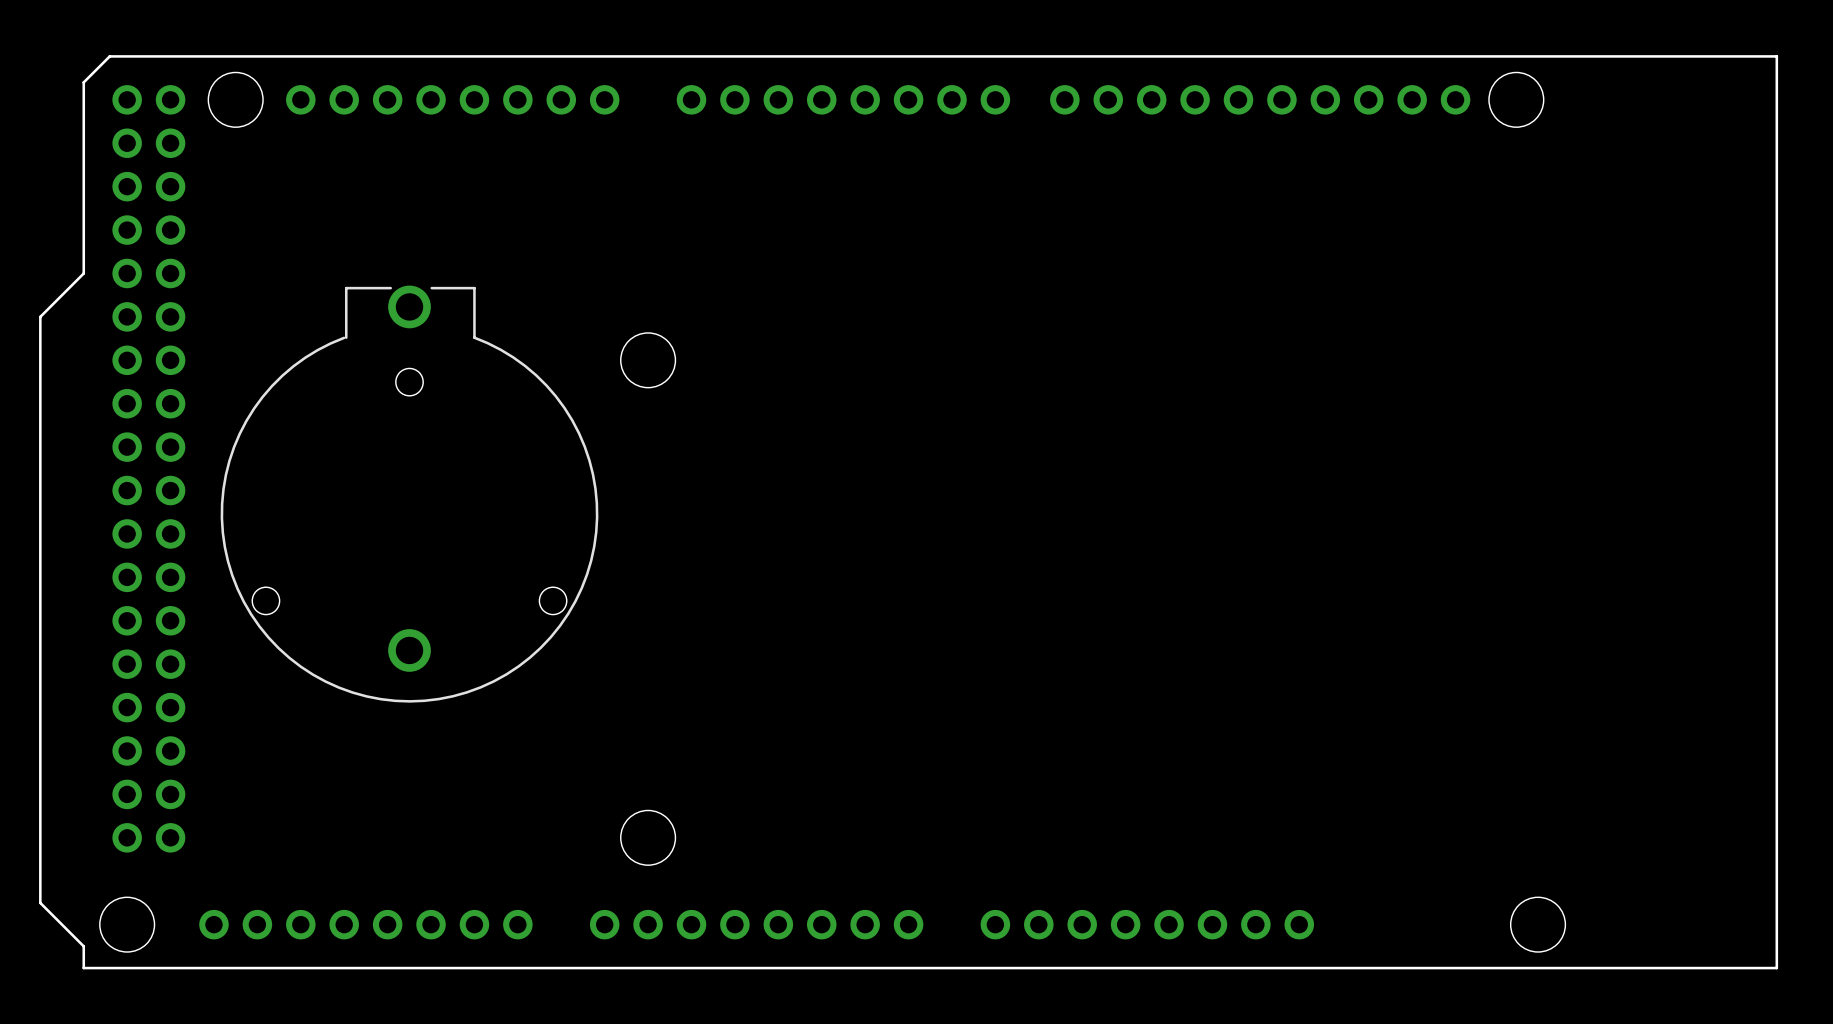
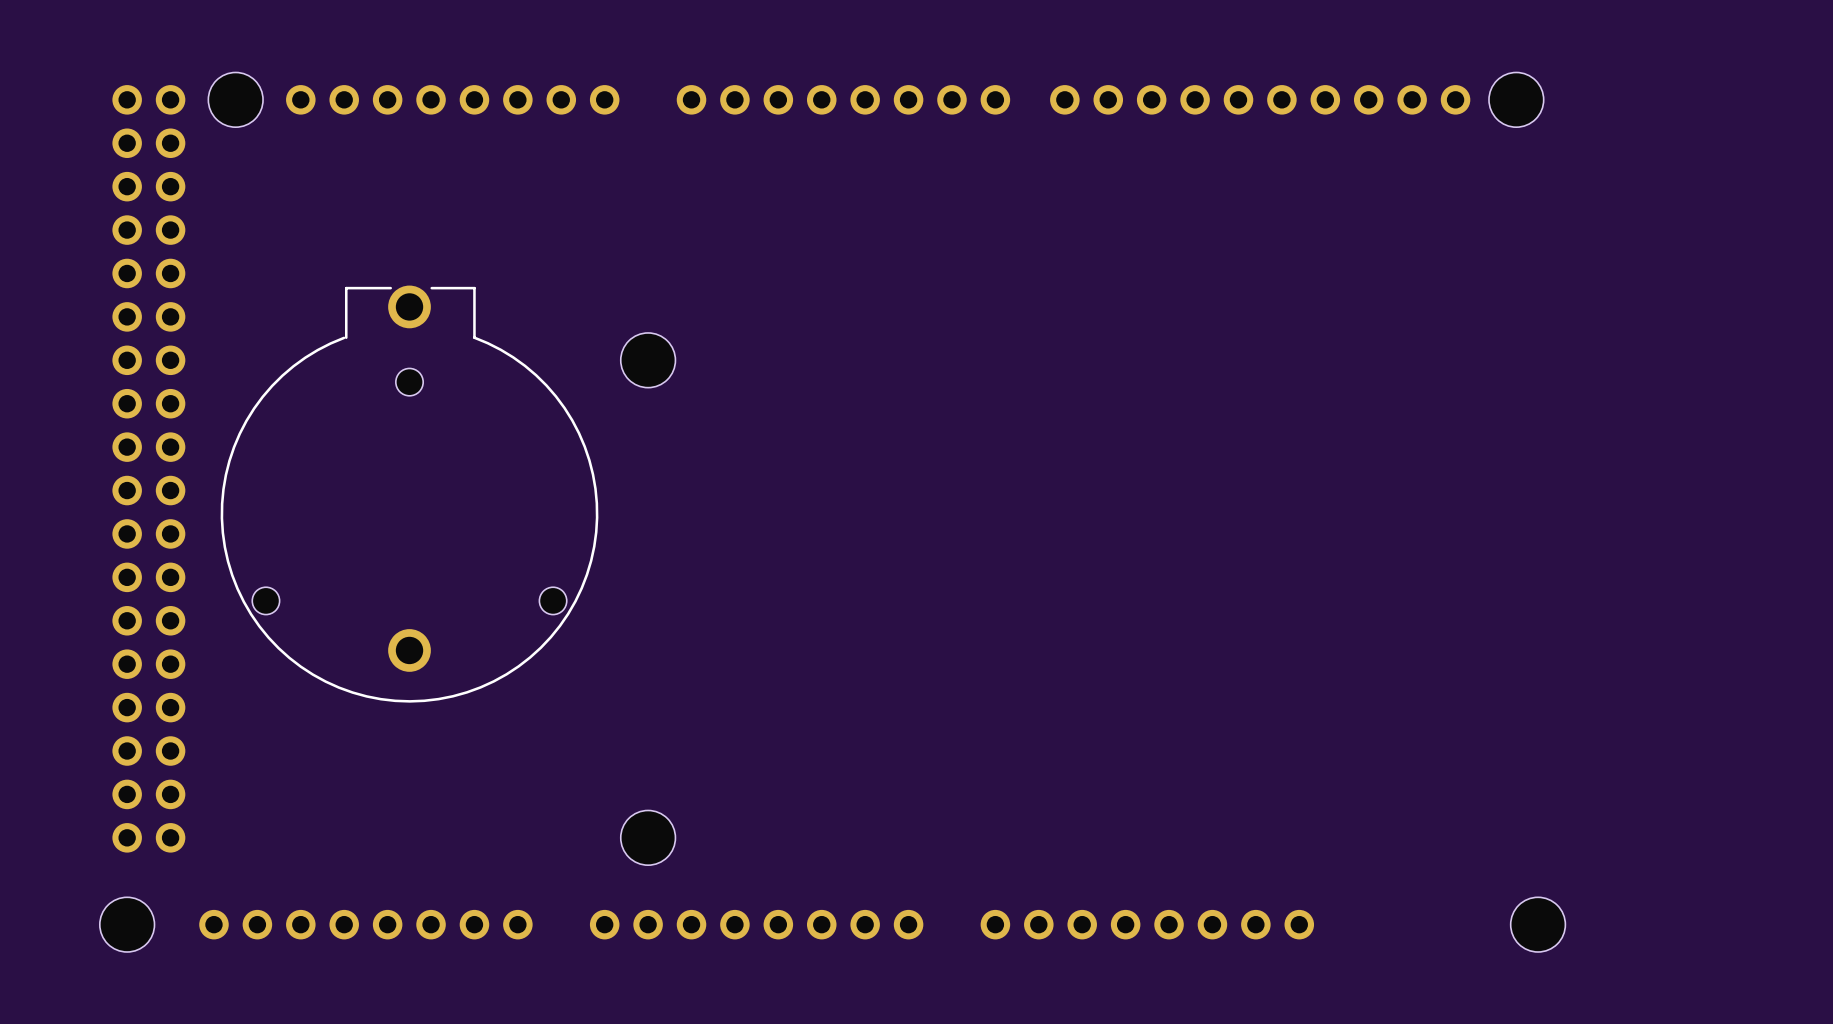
board edge: (1776, 56) (109, 56) (83, 82) (83, 273) (40, 316) (40, 902) (83, 946) (83, 968) (1776, 968) (1776, 56) -> none

